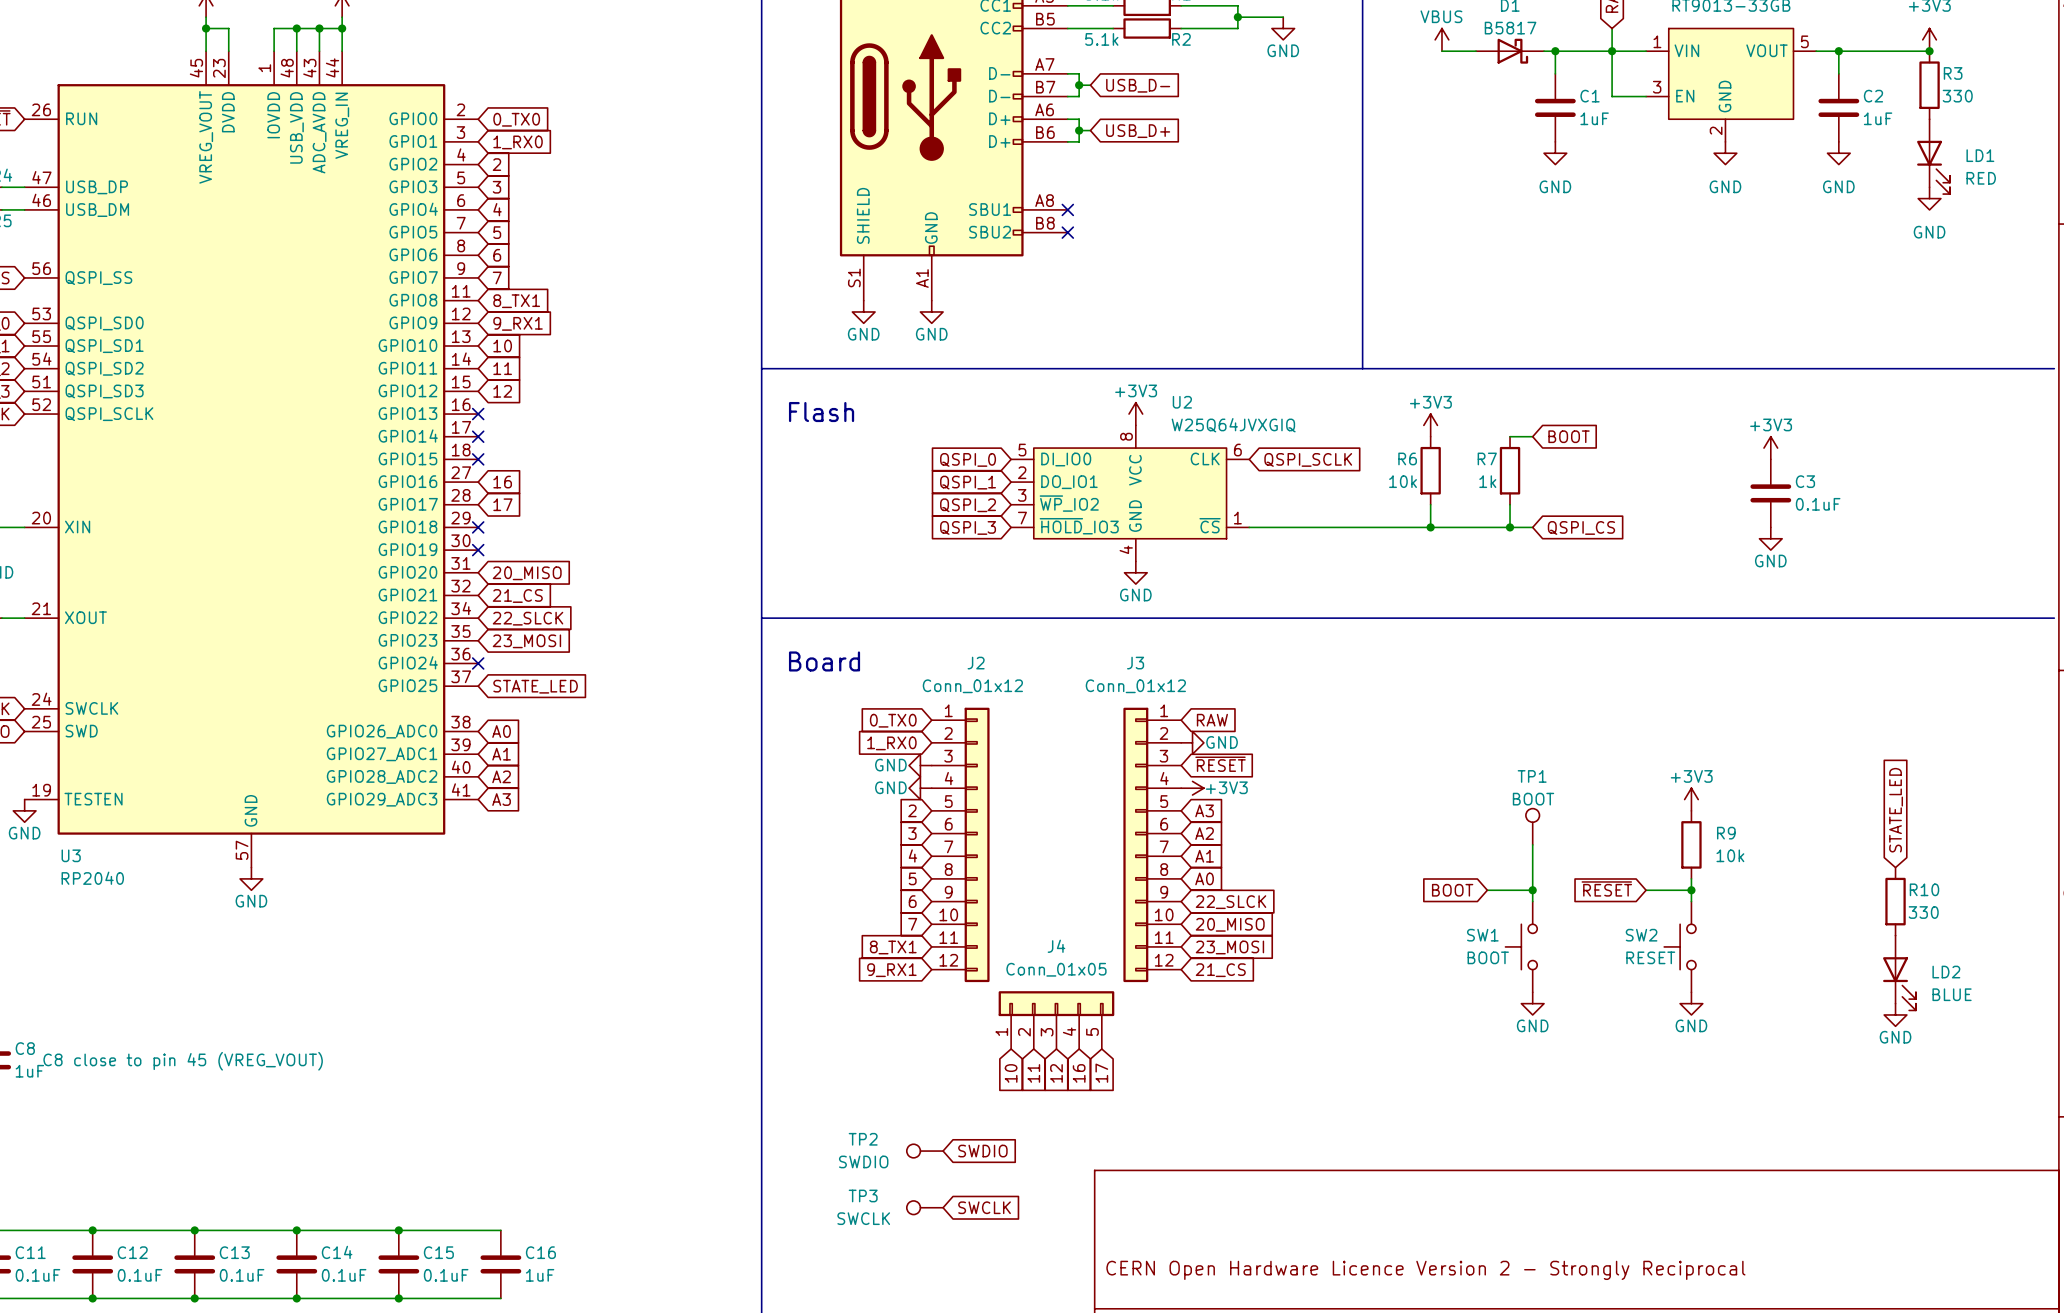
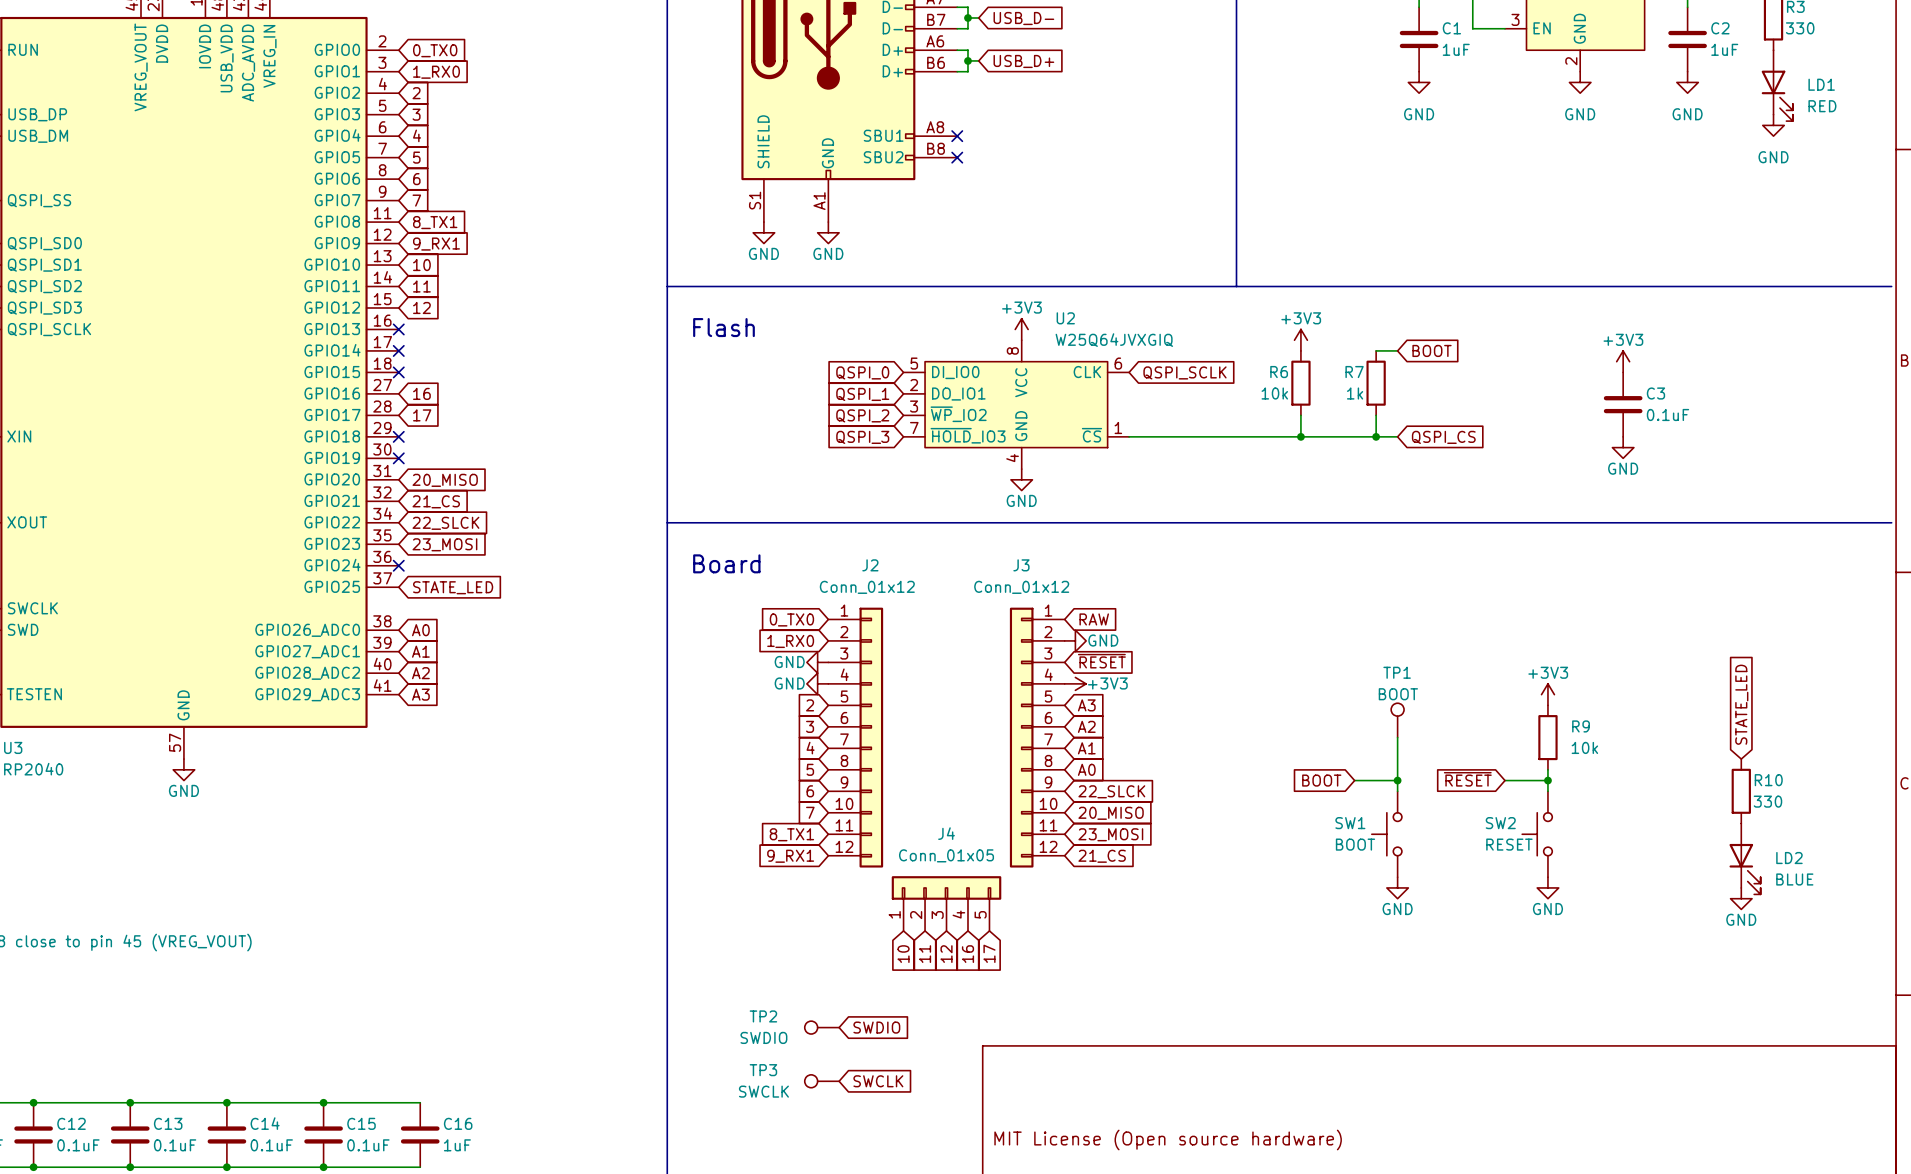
title block: CERN Open Hardware Licence Version 2 - Strongly Reciprocal (1425, 1270) -> MIT License (Open source hardware) (1168, 1140)

